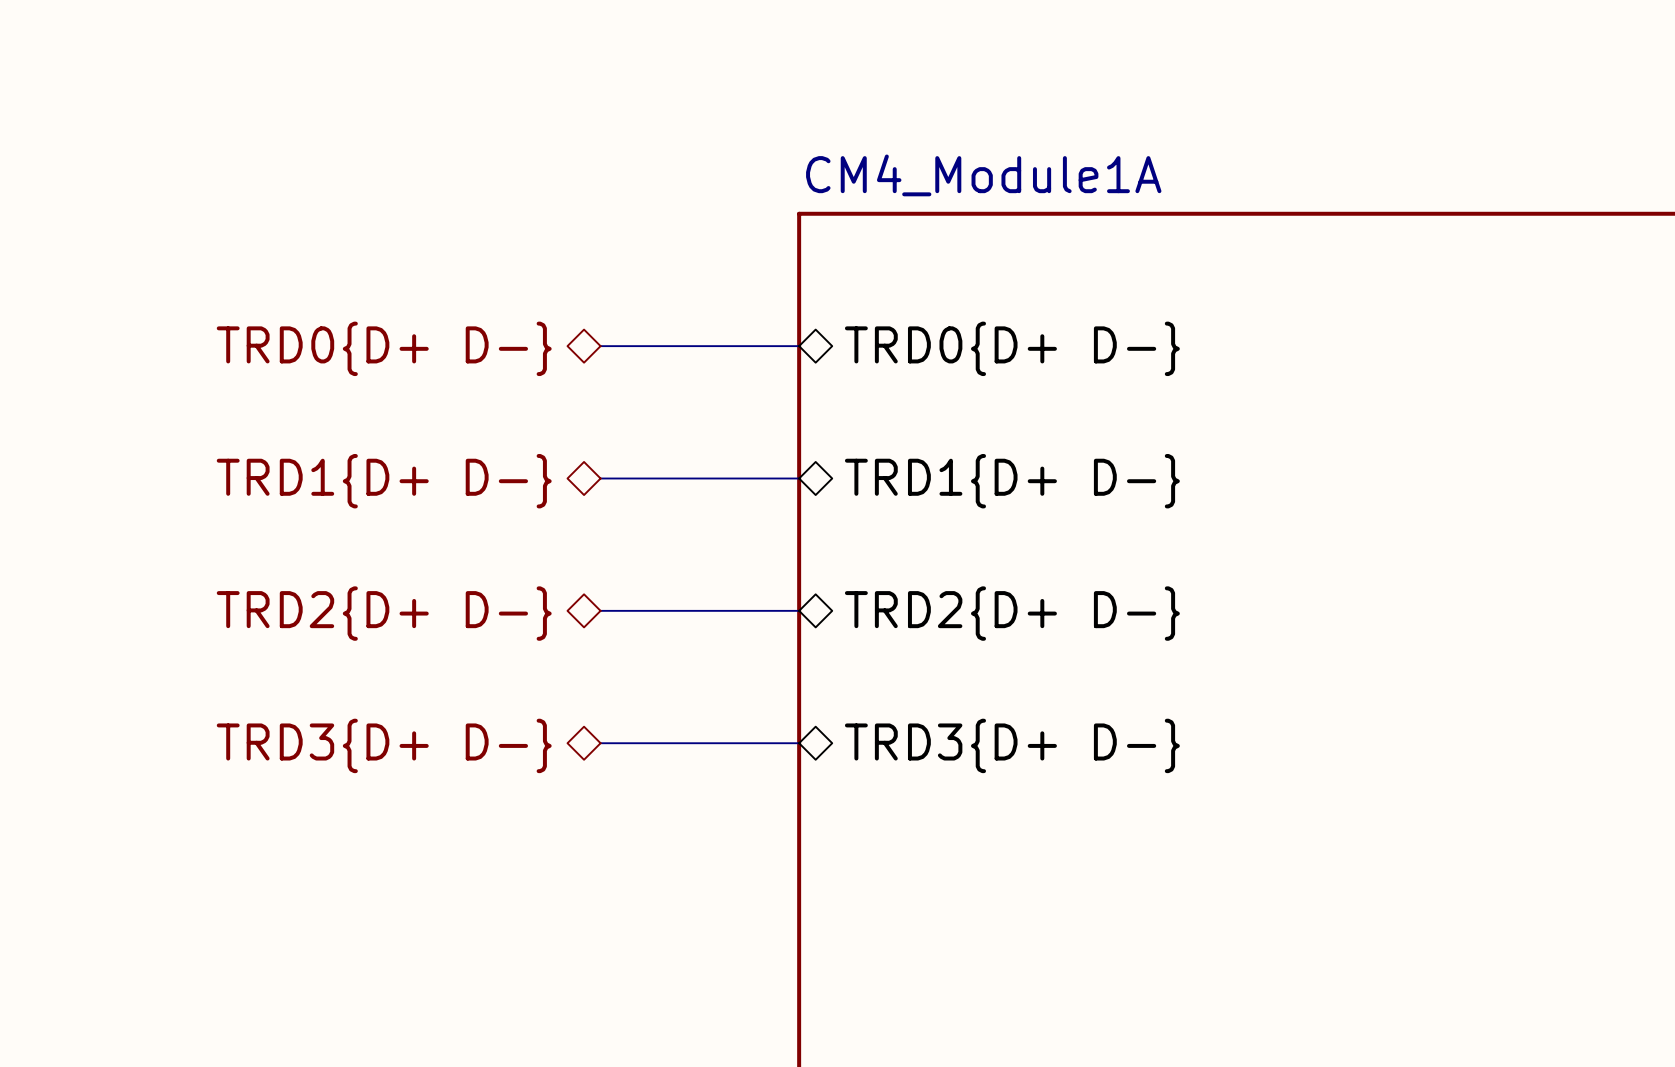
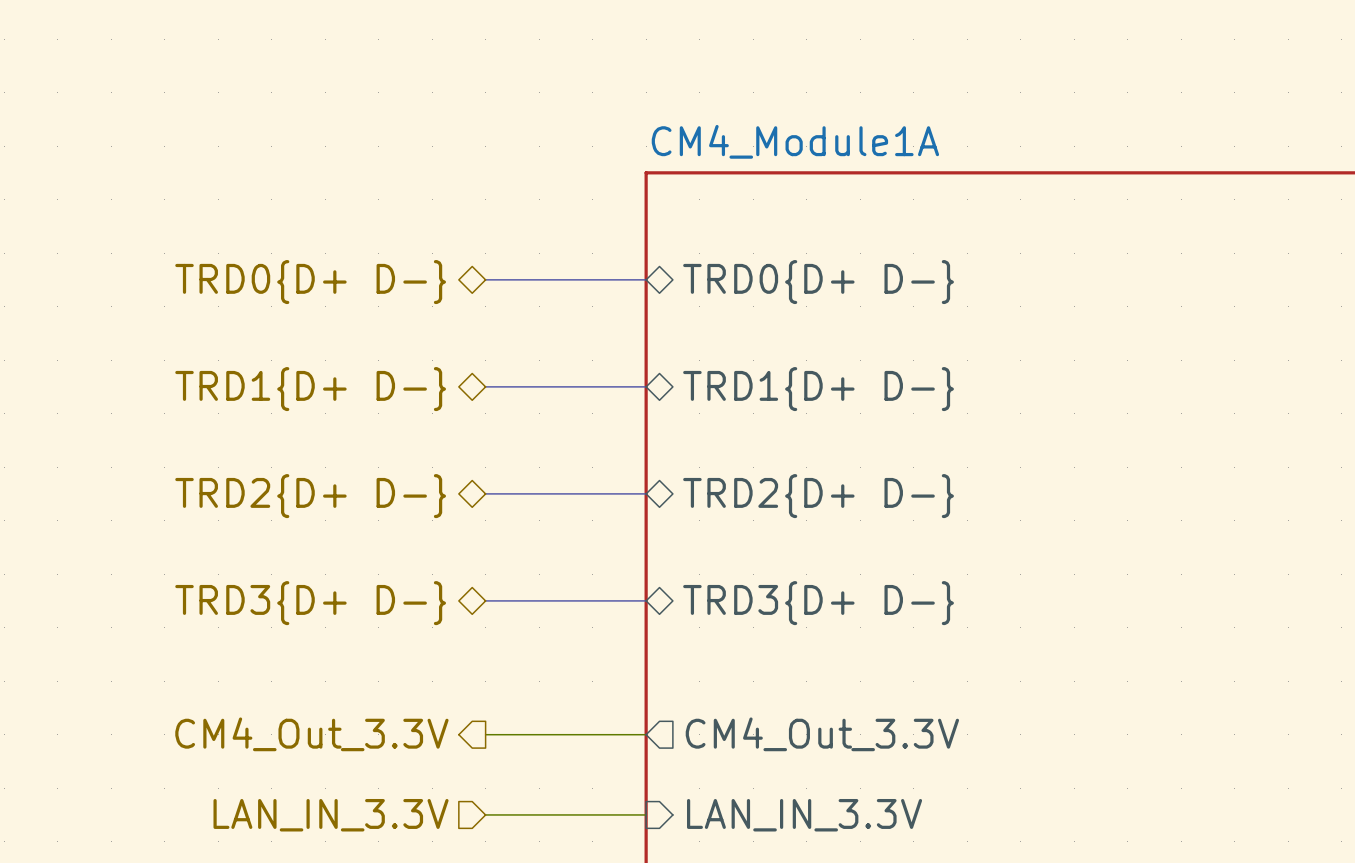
hierarchical label: none -> CM4_Out_3.3V (311, 734)
wire: none -> (485, 734) (646, 734)
sheet pin: none -> CM4_Out_3.3V (822, 734)
wire: none -> (485, 814) (646, 814)
hierarchical label: none -> LAN_IN_3.3V (331, 815)
sheet pin: none -> LAN_IN_3.3V (804, 815)

